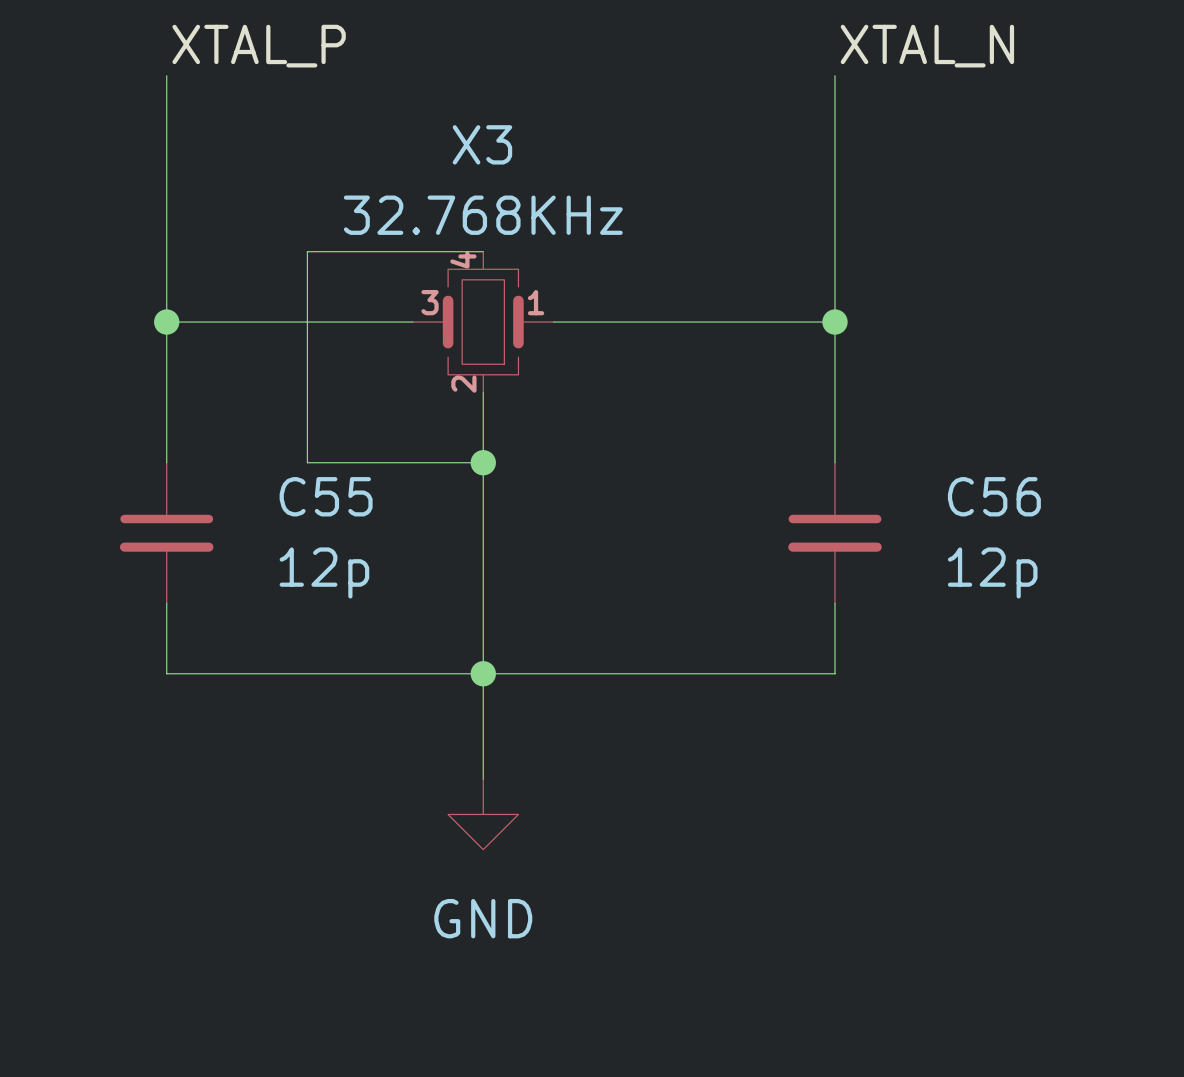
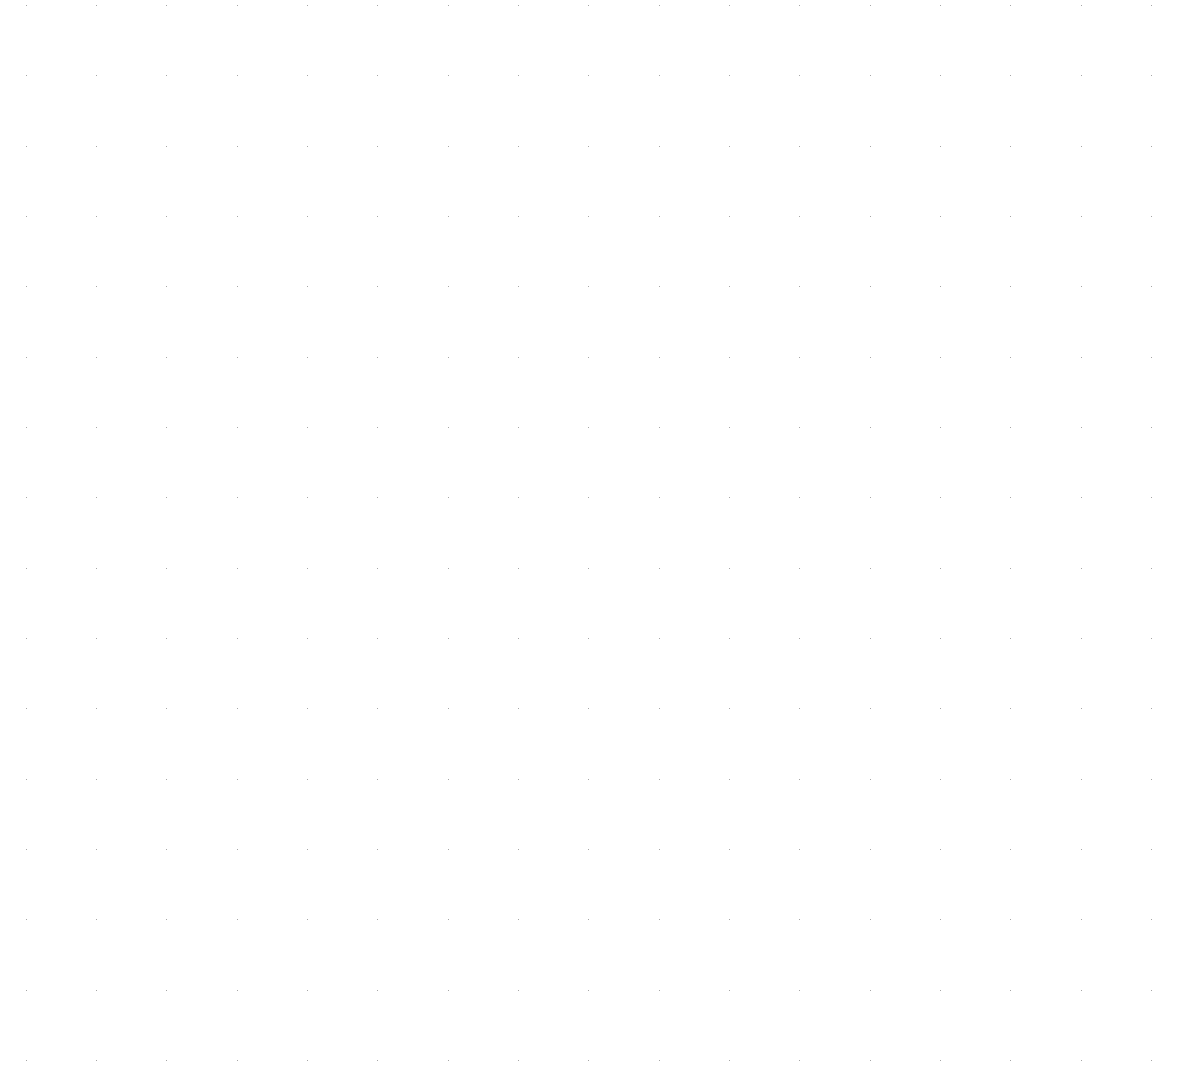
label: XTAL_P (259, 46) -> none
label: XTAL_N (927, 46) -> none
wire: (166, 75) (166, 462) -> none
wire: (835, 75) (835, 462) -> none
wire: (483, 251) (307, 251) (307, 462) (483, 462) -> none
wire: (166, 322) (412, 322) -> none
junction: (166, 322) -> none
X3: 32.768KHz (483, 322) -> none
wire: (553, 322) (835, 322) -> none
junction: (835, 322) -> none
wire: (483, 392) (483, 779) -> none
junction: (483, 462) -> none
C55: 12p (166, 533) -> none
C56: 12p (835, 533) -> none
wire: (166, 603) (166, 673) (835, 673) (835, 603) -> none
junction: (483, 673) -> none
power symbol: GND (483, 814) -> none

